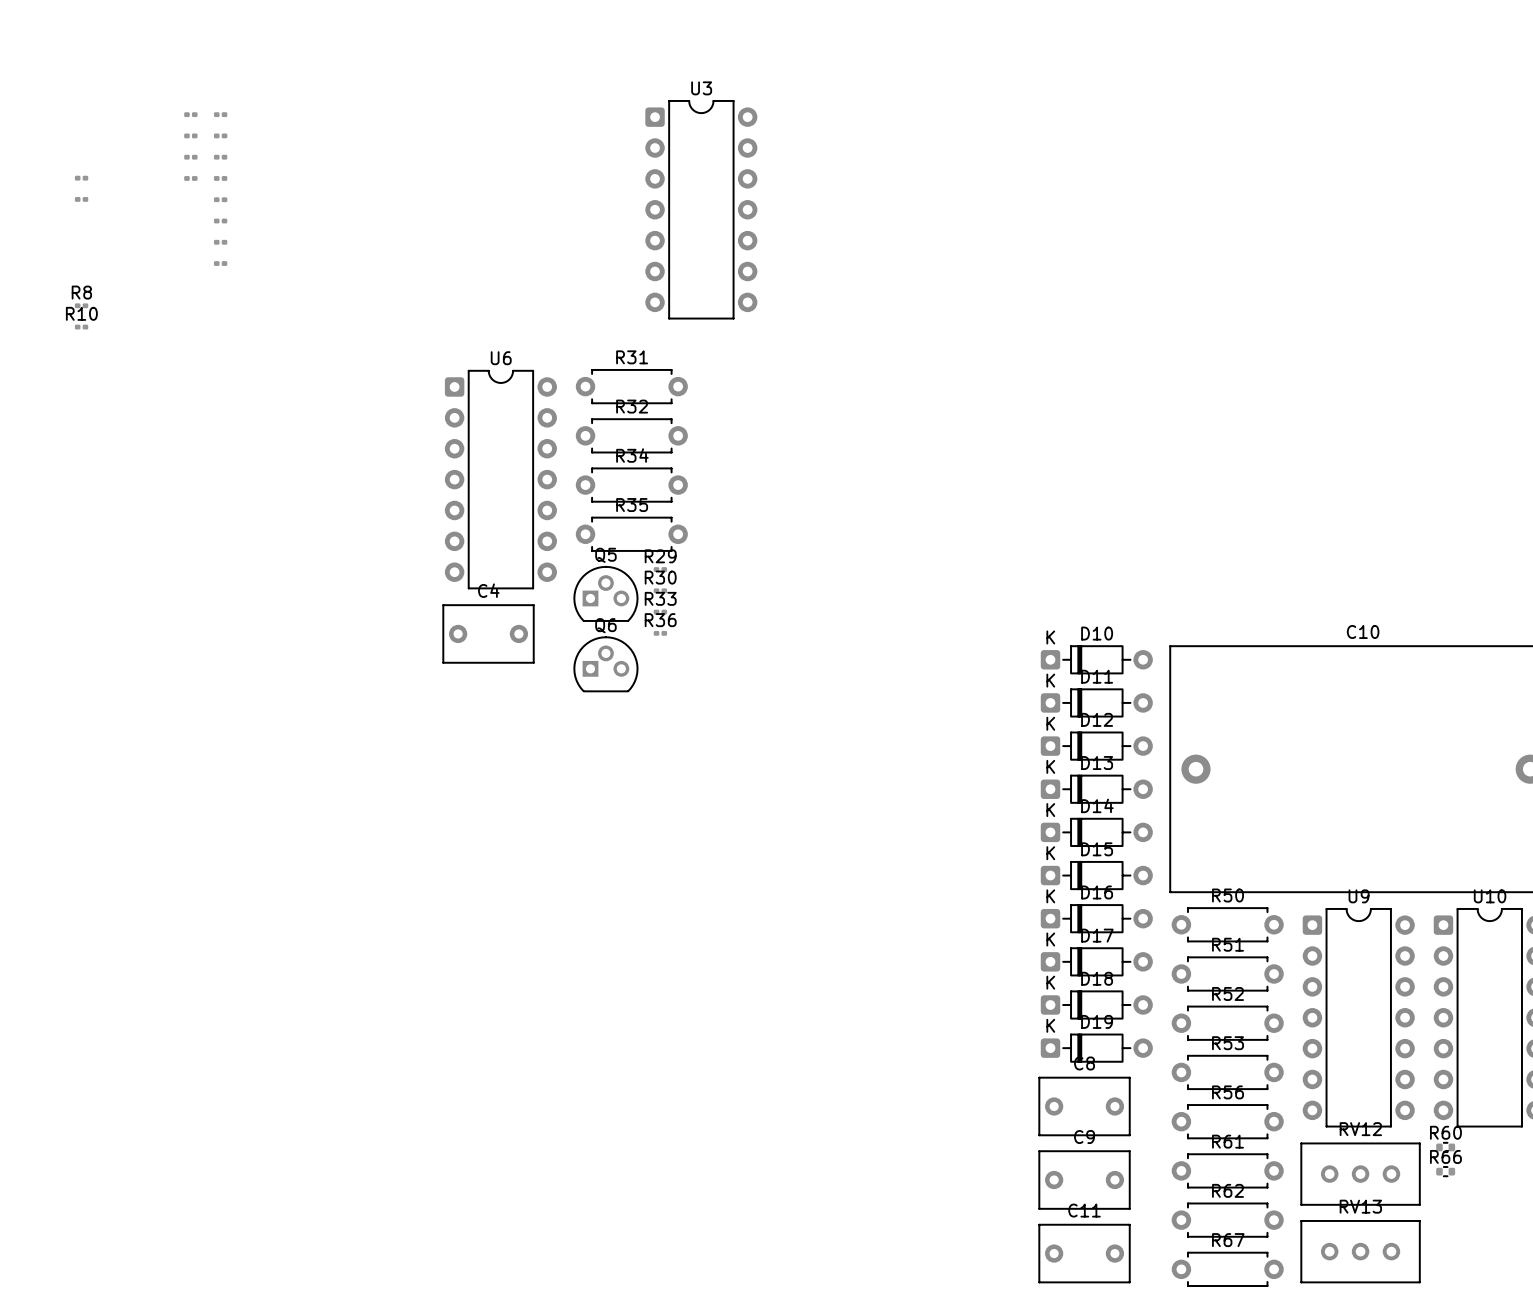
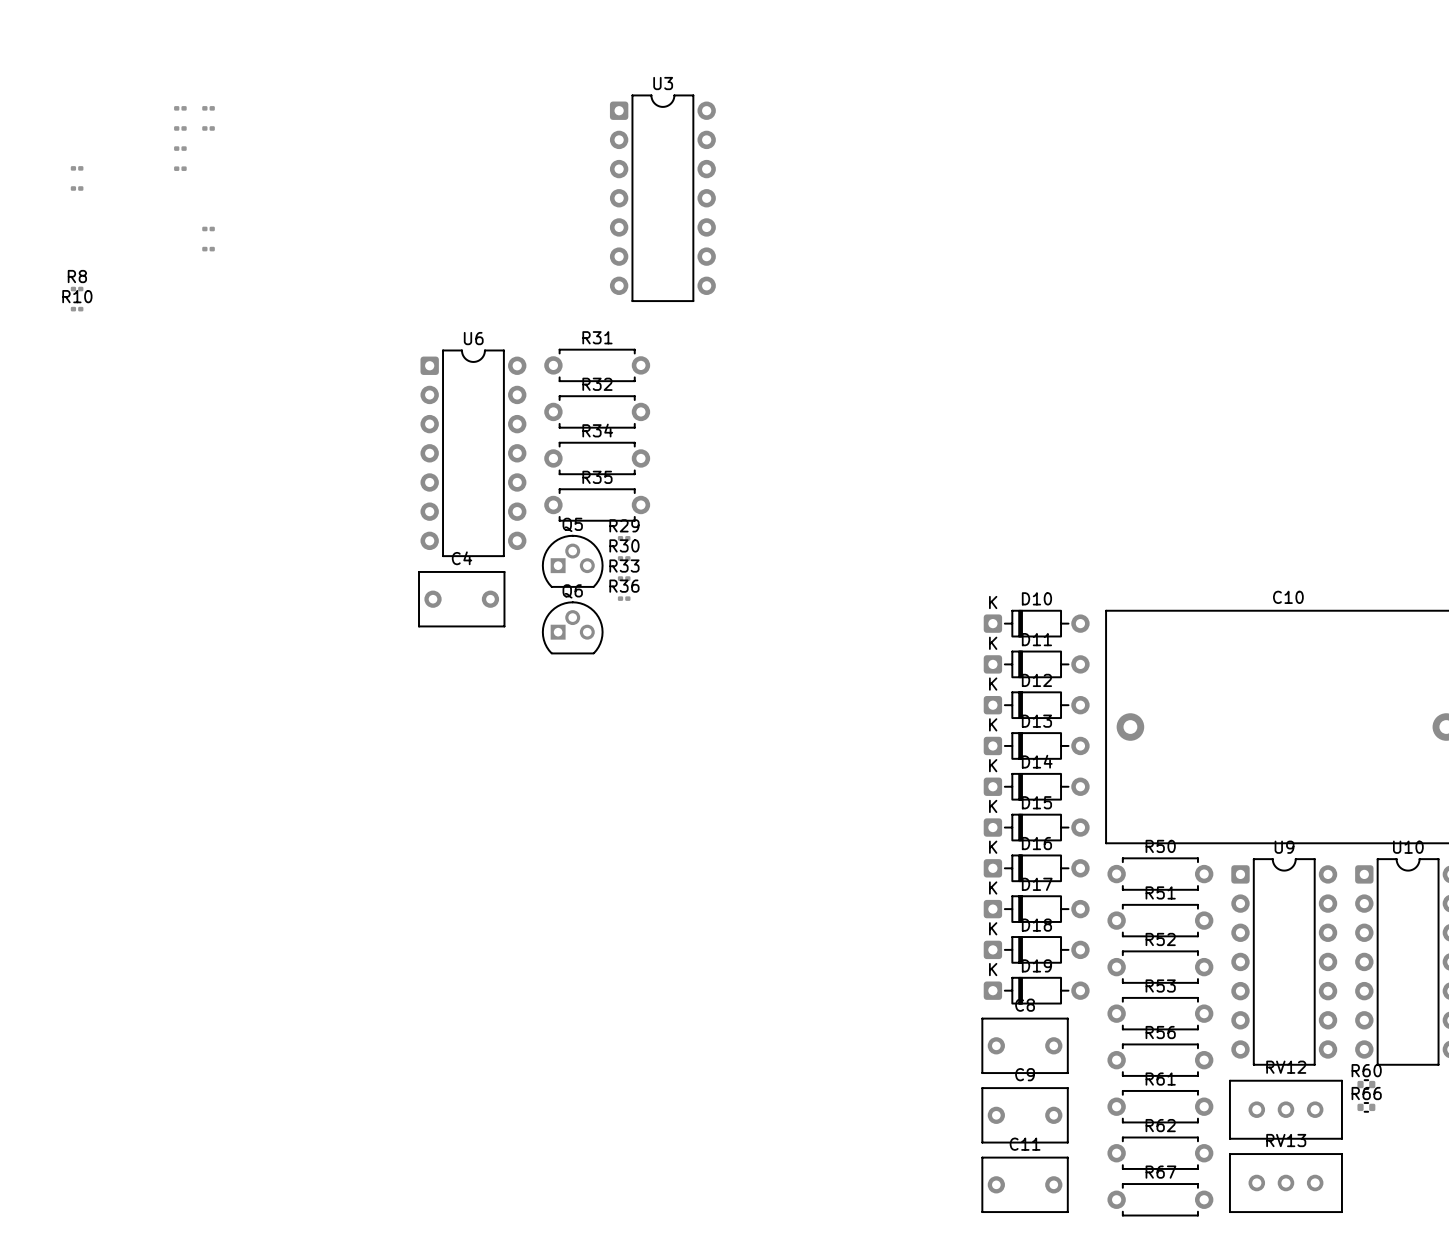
part: (220, 157) -> none
part: (220, 178) -> none
part: (220, 199) -> none
part: (220, 221) -> none

